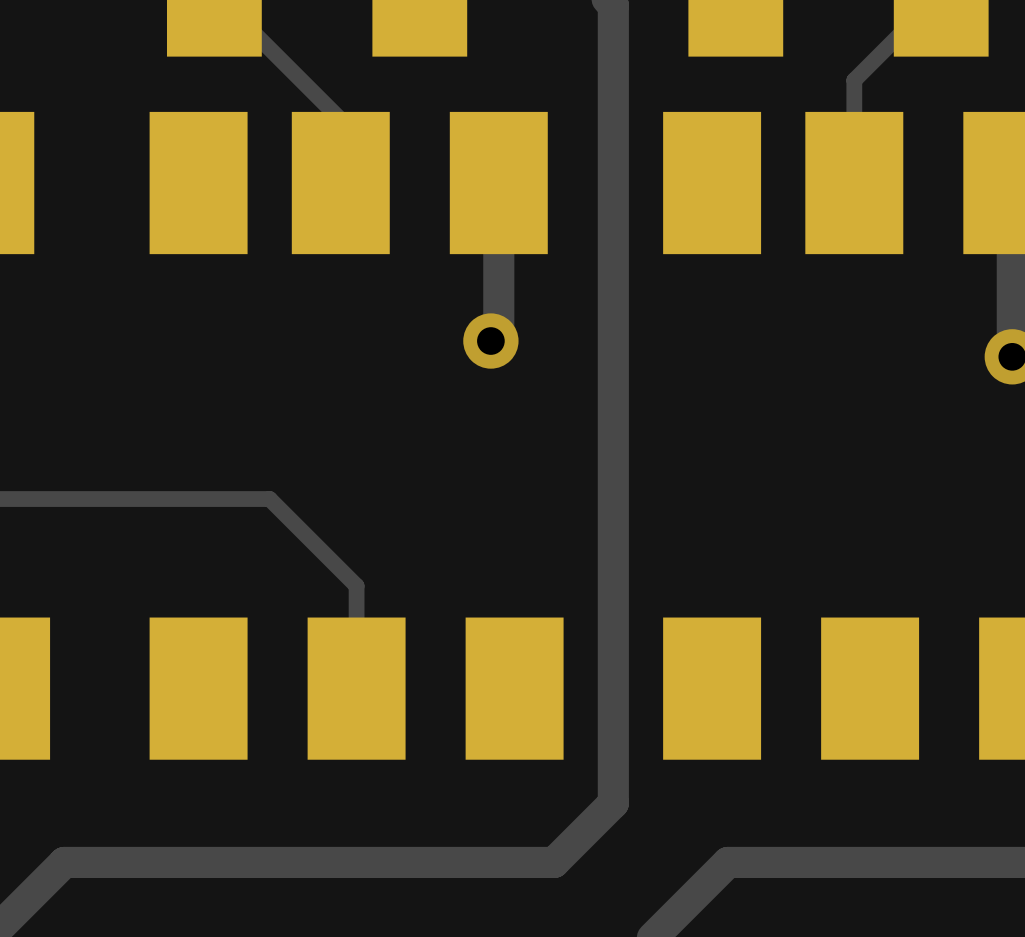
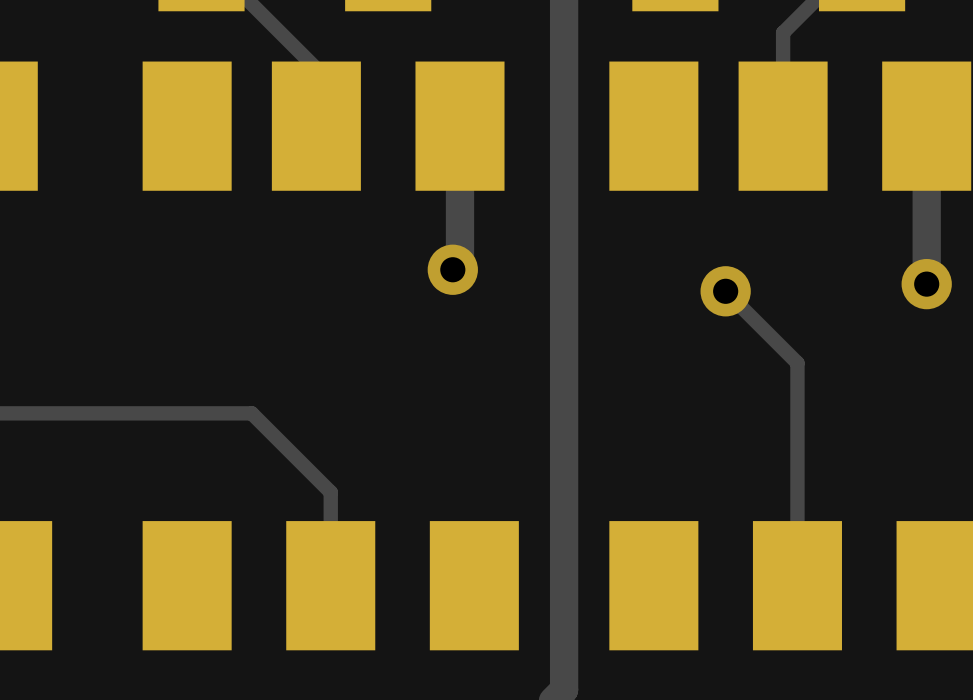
track: none -> (725, 291) (797, 363) (797, 585)
via: none -> (725, 291)

